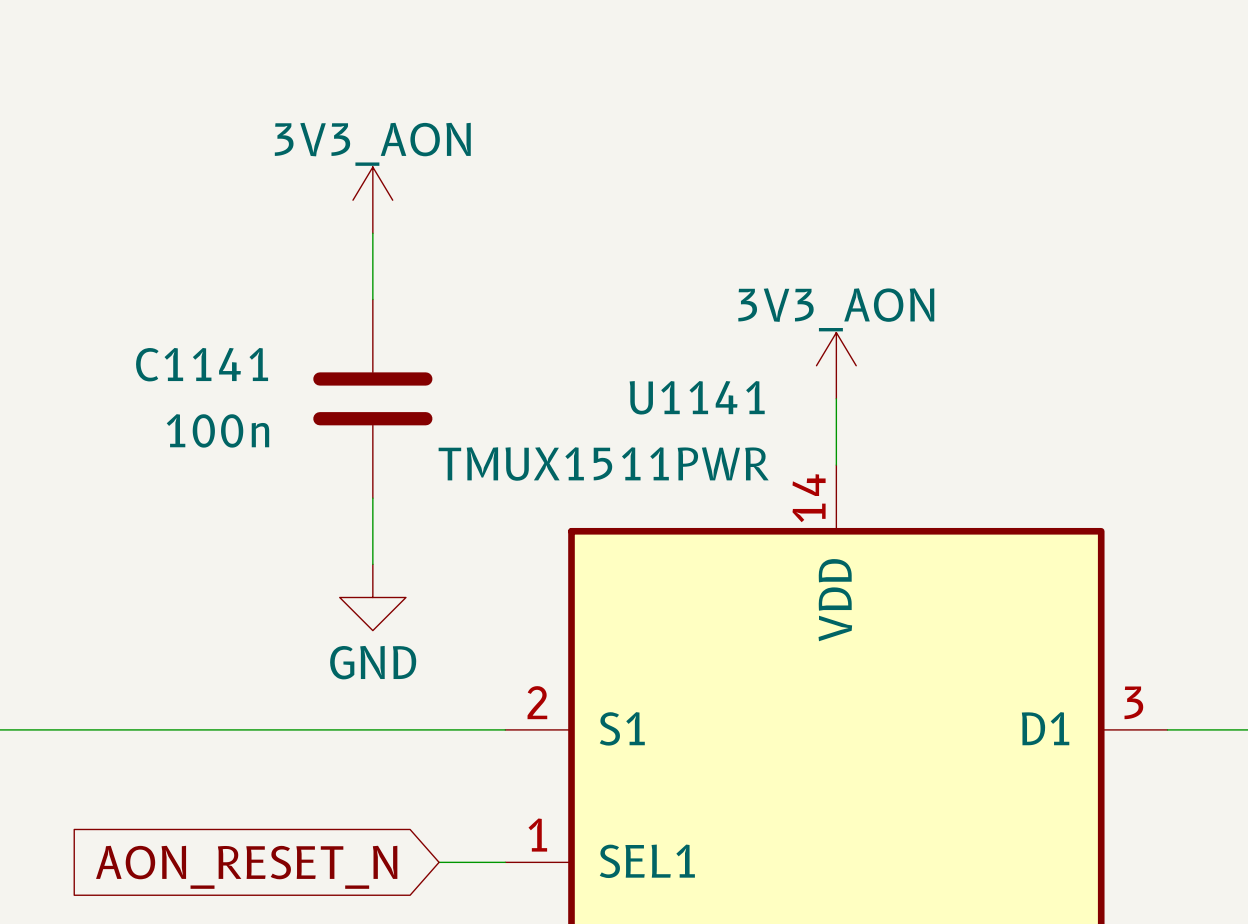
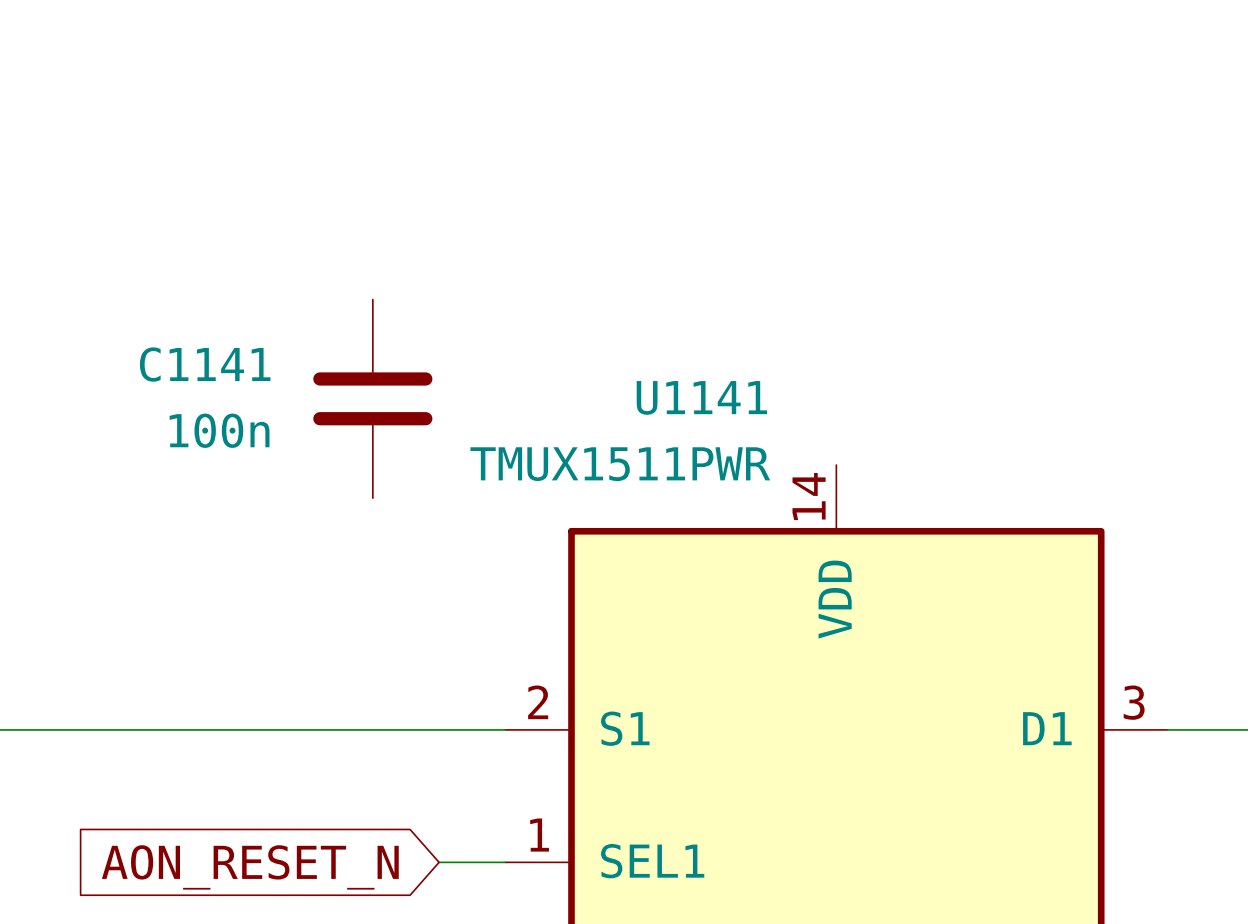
power symbol: 3V3_AON (372, 200) -> none
wire: (372, 233) (372, 299) -> none
power symbol: 3V3_AON (836, 365) -> none
wire: (836, 398) (836, 465) -> none
wire: (372, 498) (372, 564) -> none
power symbol: GND (372, 597) -> none

